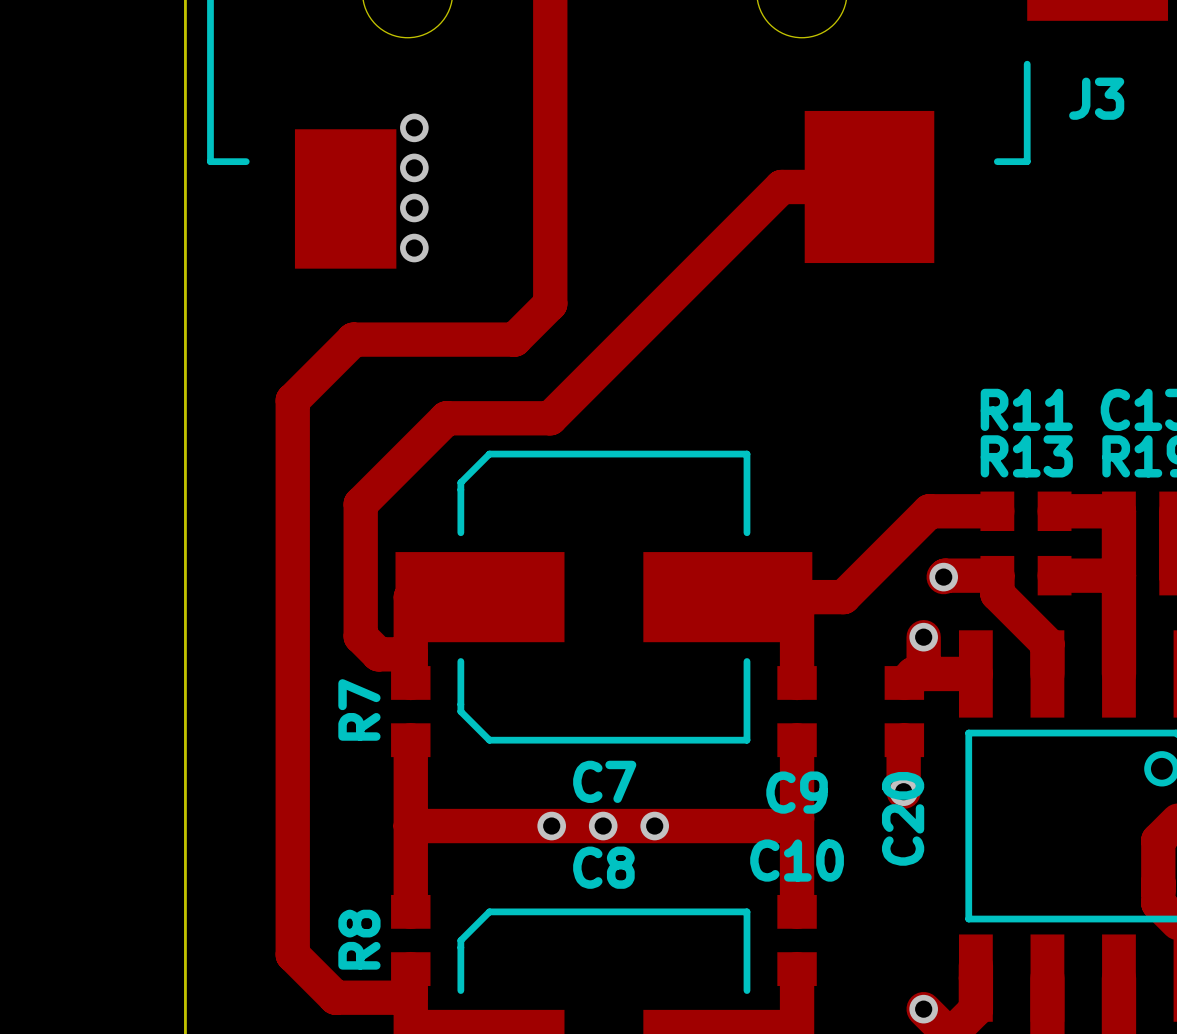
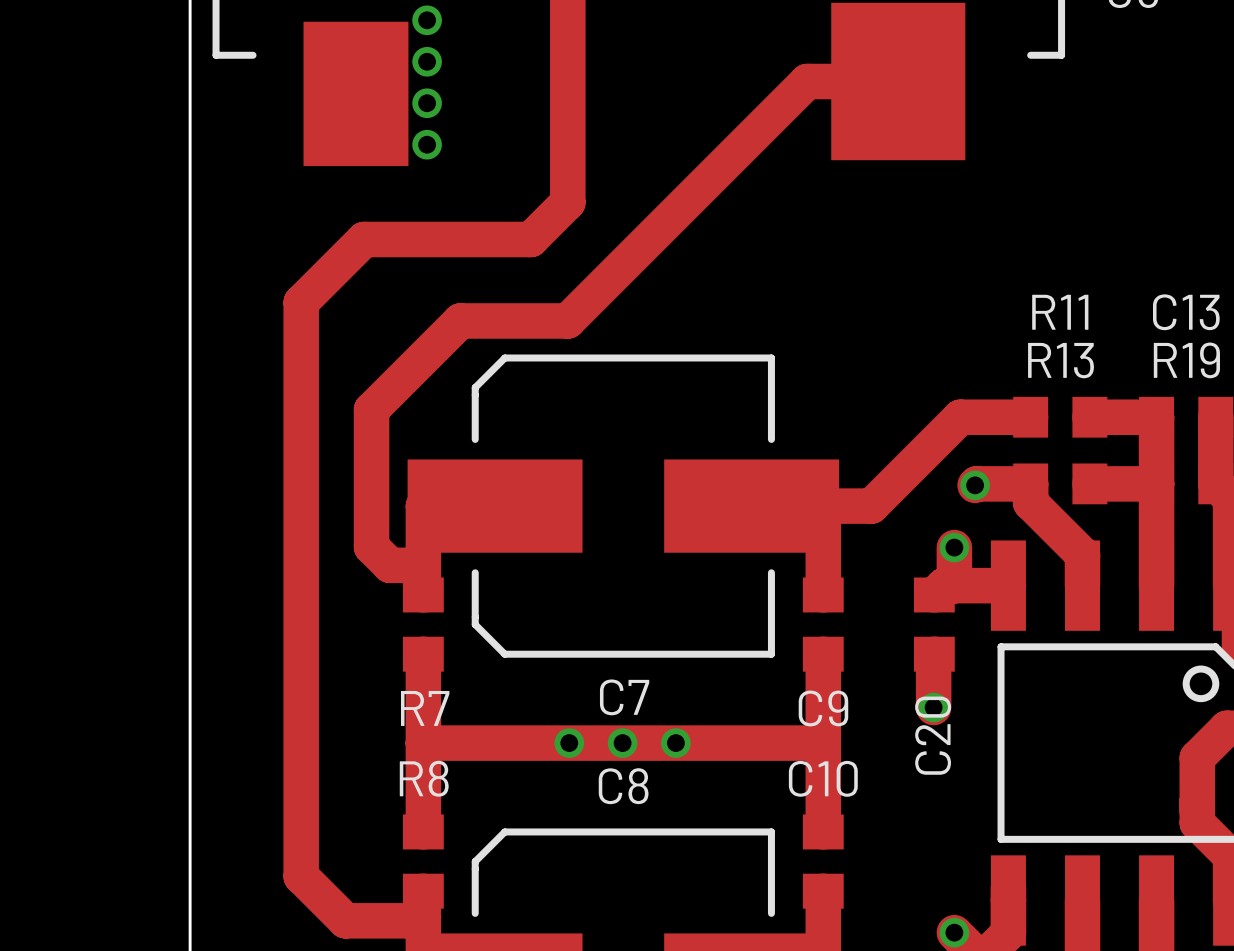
R7 name rotation: 0° (359, 709) -> 90° clockwise (425, 708)
R7 name position: R7 (359, 709) -> R7 (425, 708)
R8 name rotation: 0° (359, 939) -> 90° clockwise (424, 778)
R8 name position: R8 (359, 939) -> R8 (424, 778)

